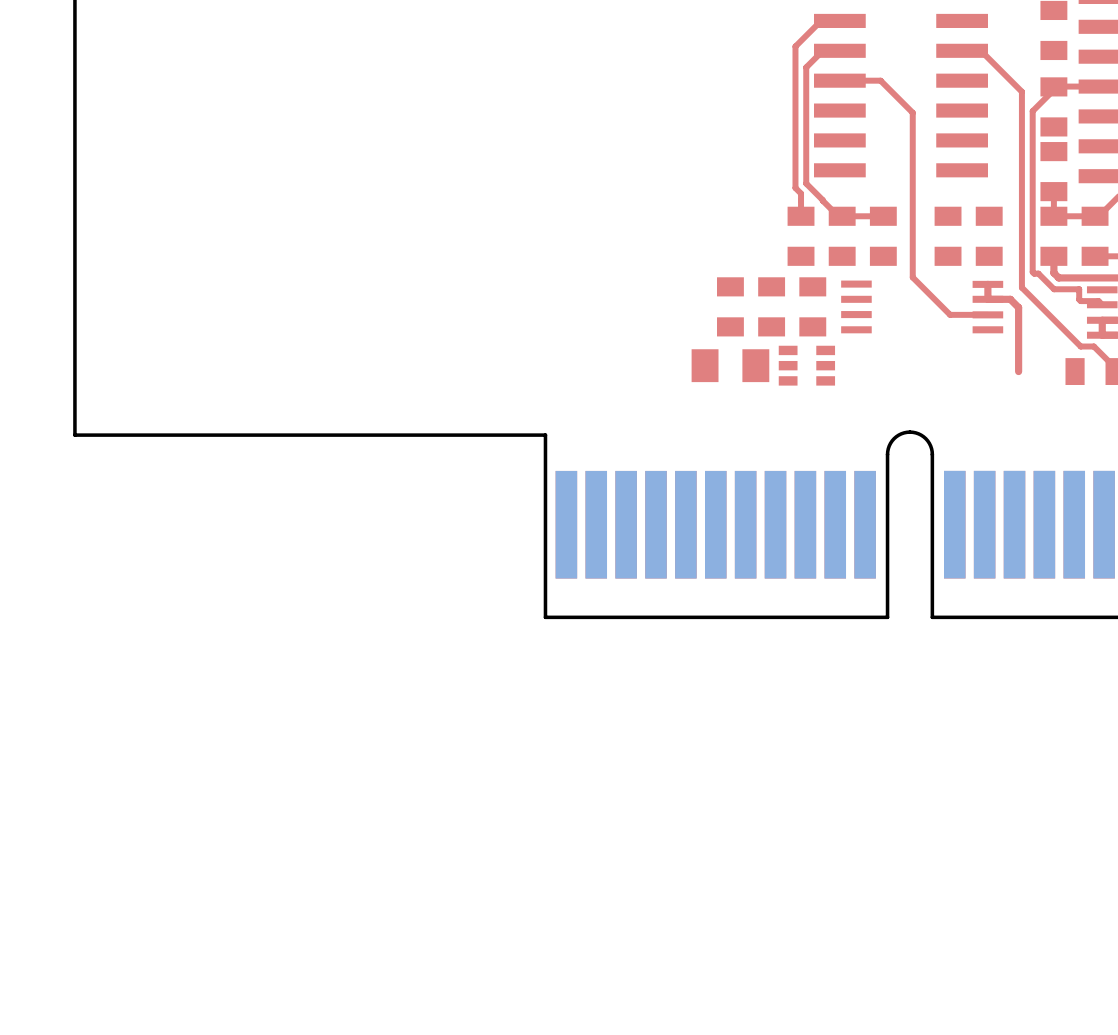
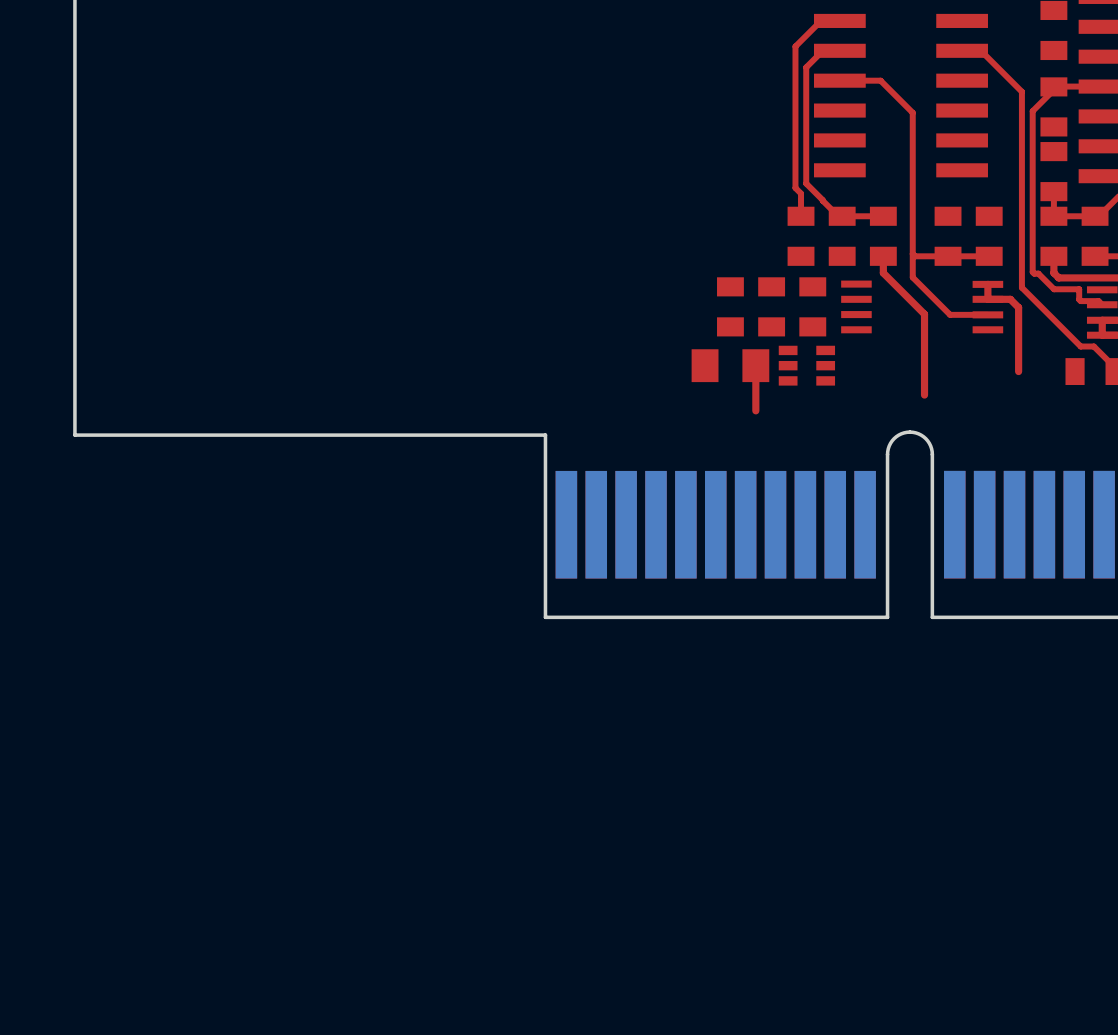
top track: none -> (912, 253) (915, 256) (989, 256)
top track: none -> (883, 256) (883, 273) (924, 314) (924, 395)
top track: none -> (755, 365) (755, 410)

